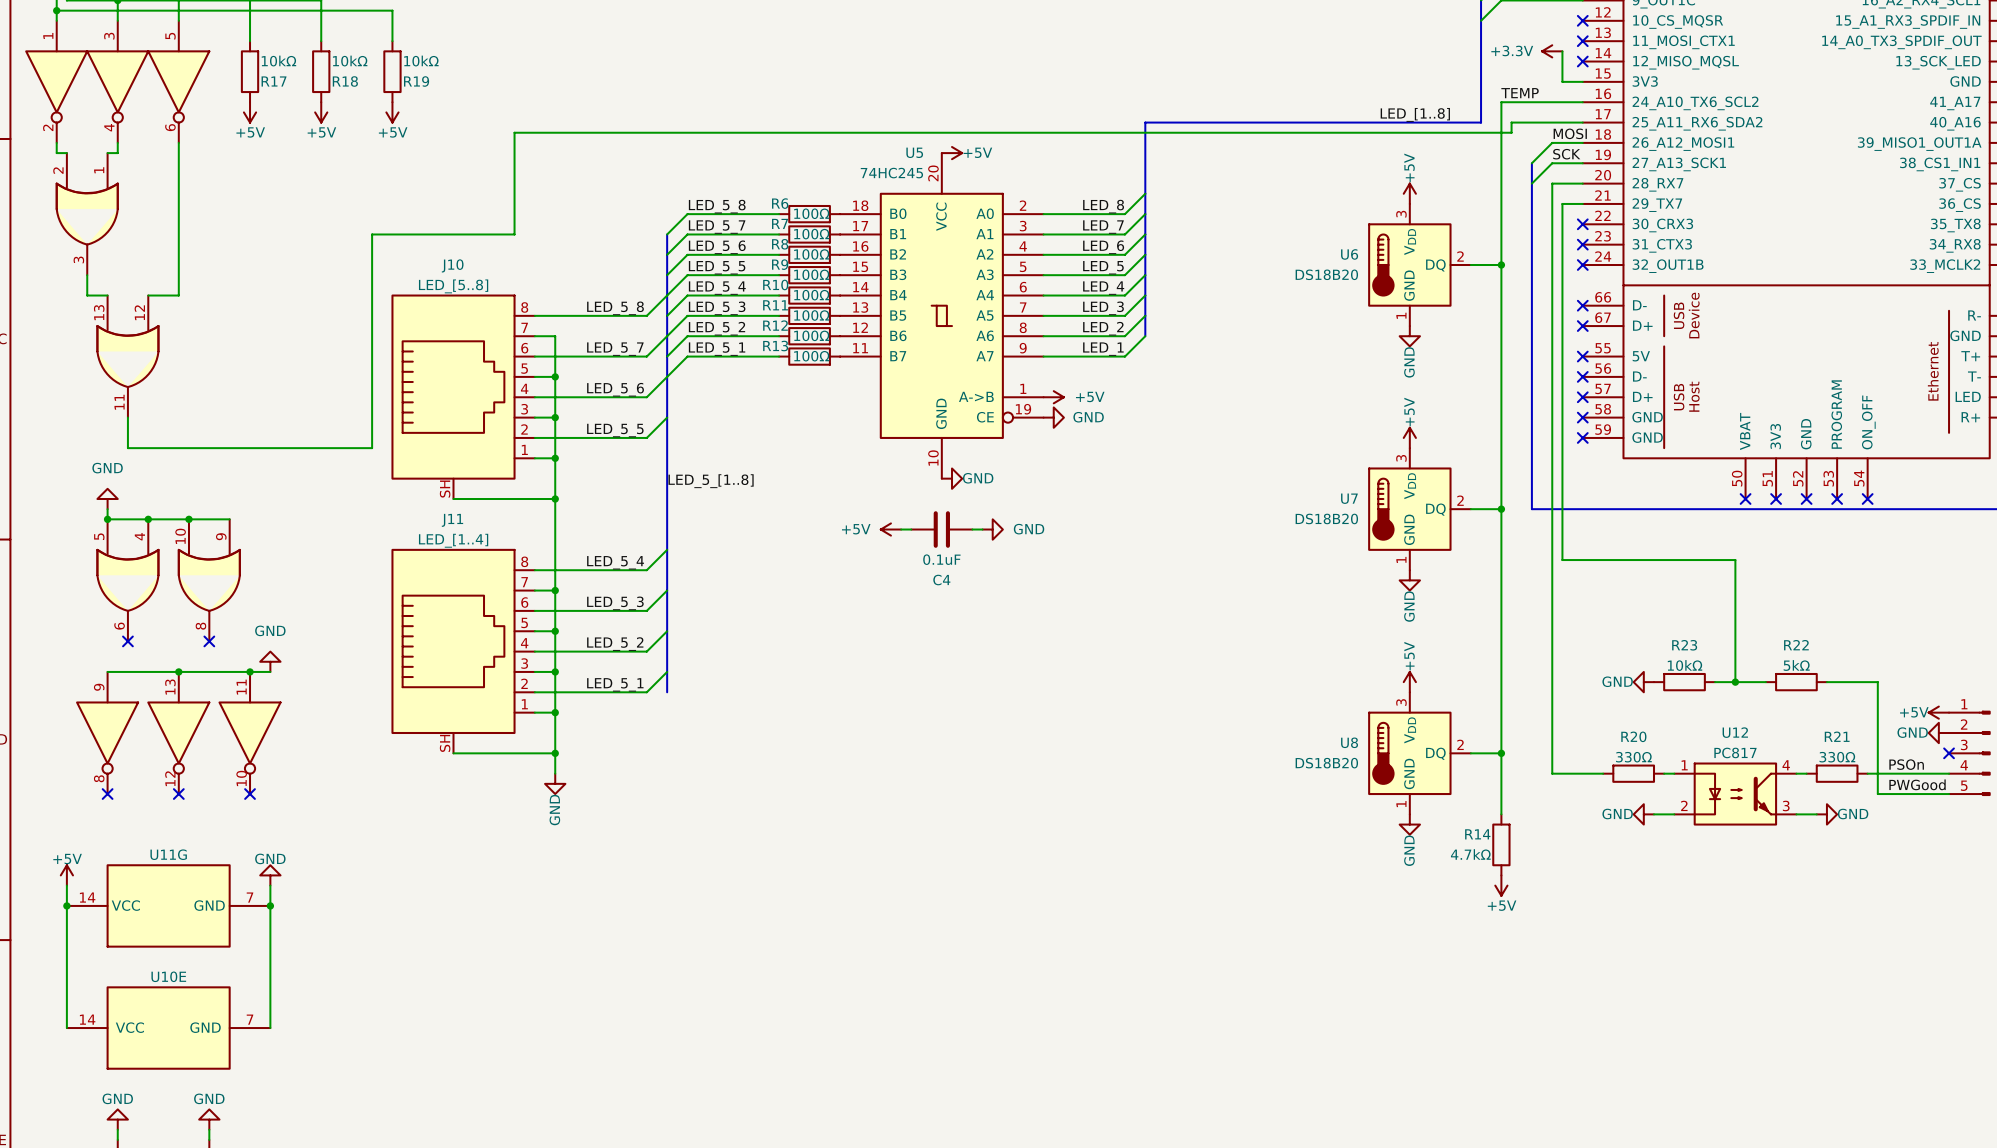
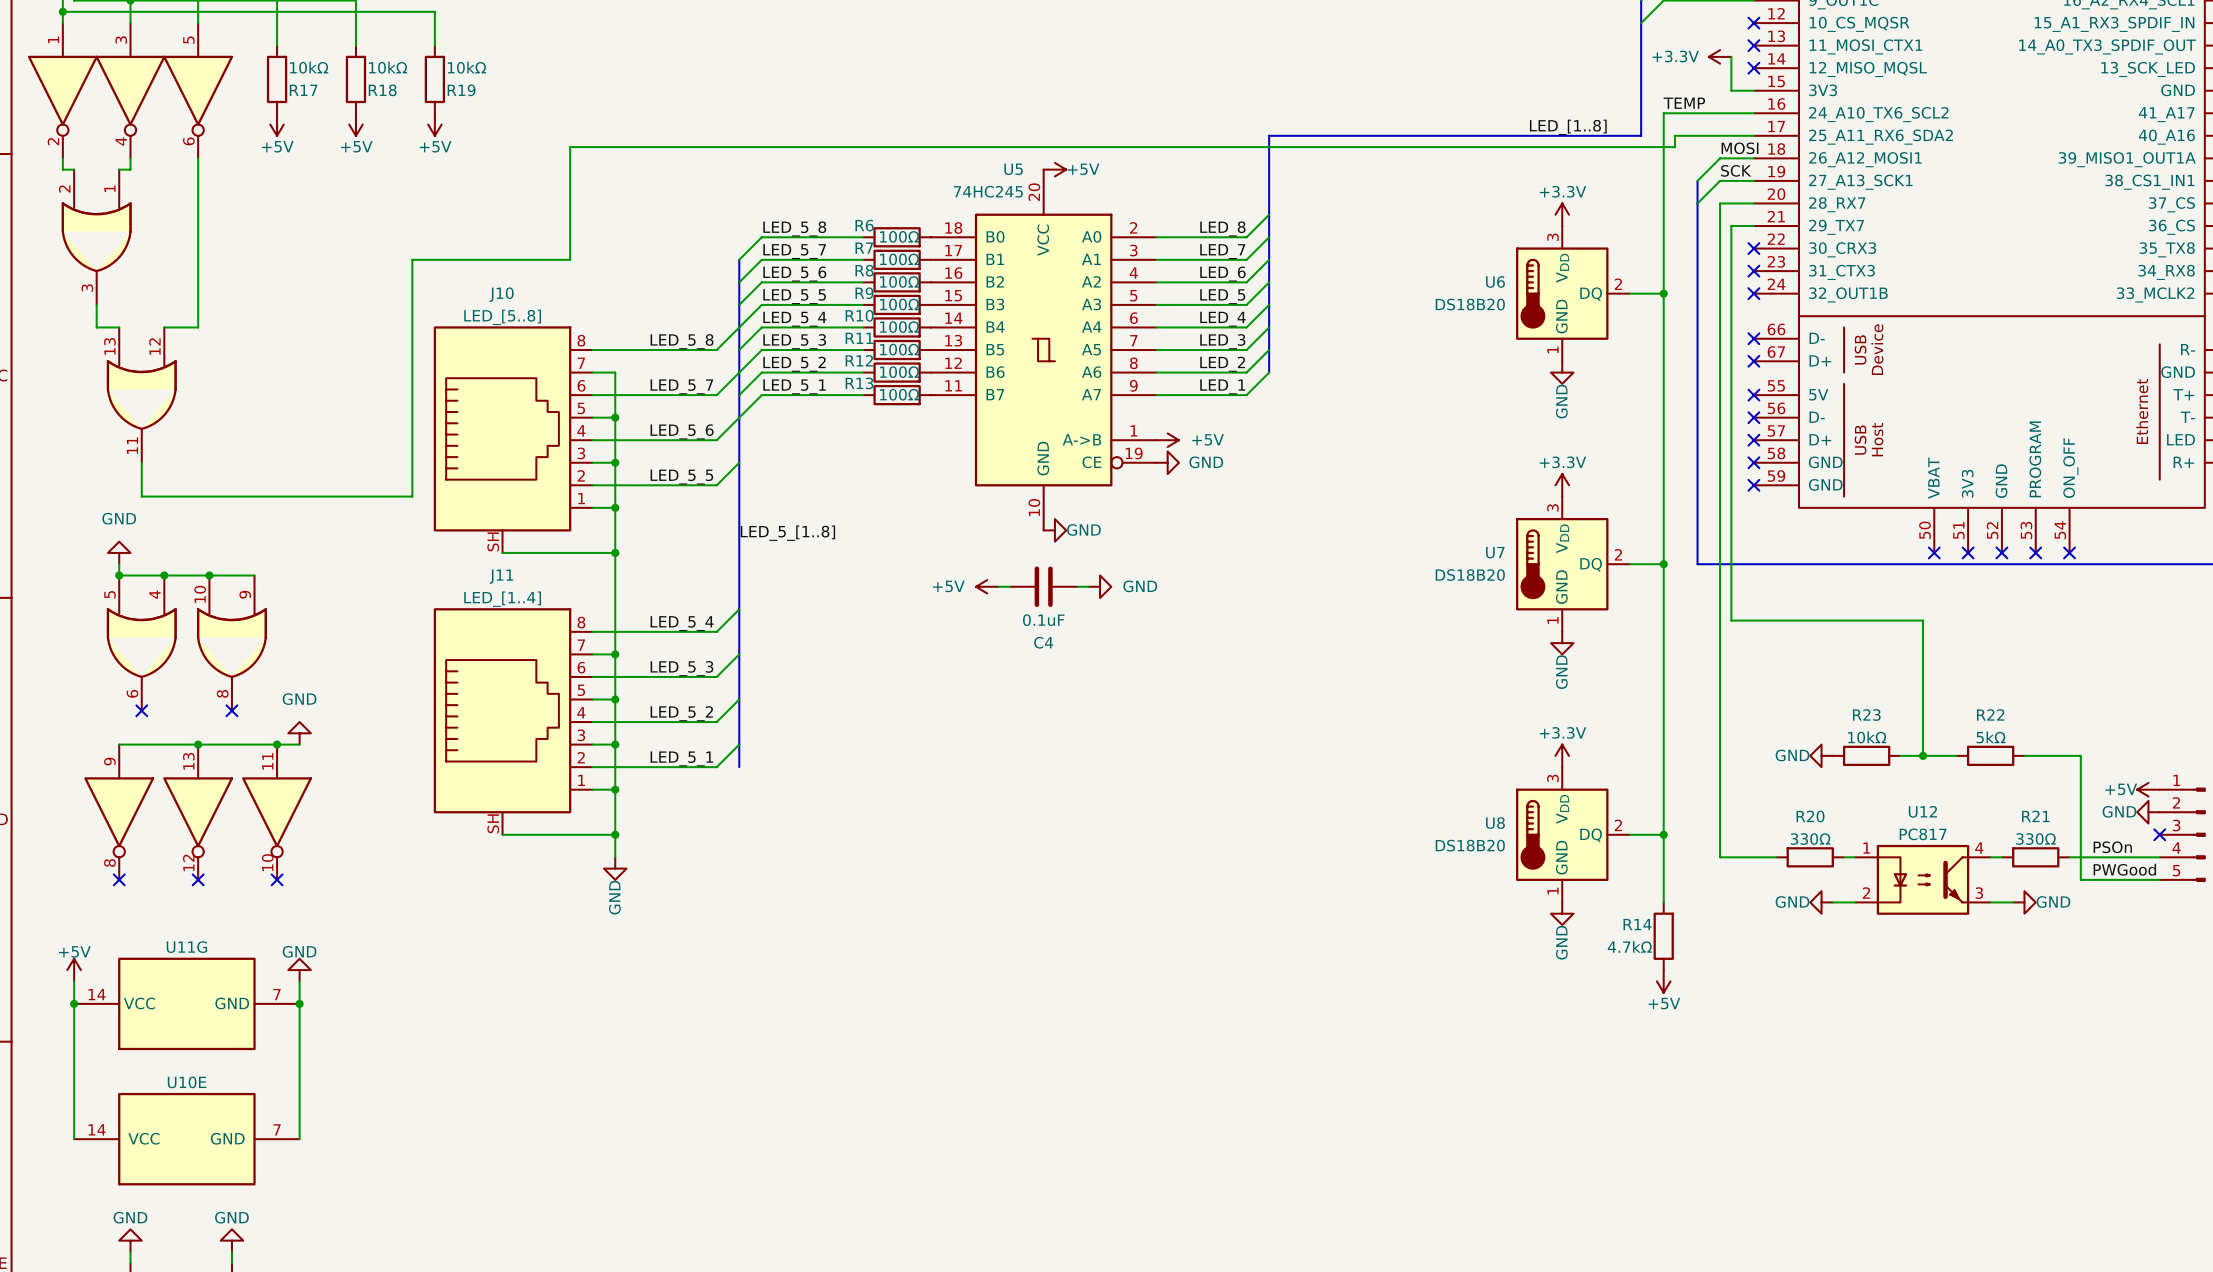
power symbol: +5V (1409, 193) -> +3.3V (1562, 214)
power symbol: +5V (1409, 437) -> +3.3V (1562, 485)
power symbol: +5V (1409, 682) -> +3.3V (1562, 755)

